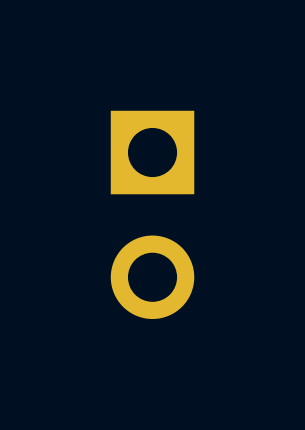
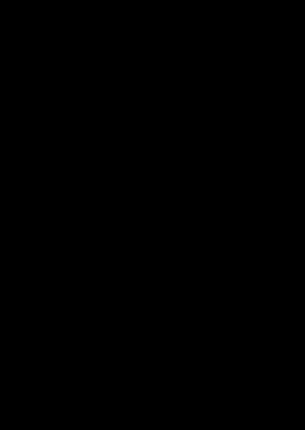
part: (152, 214) -> none

